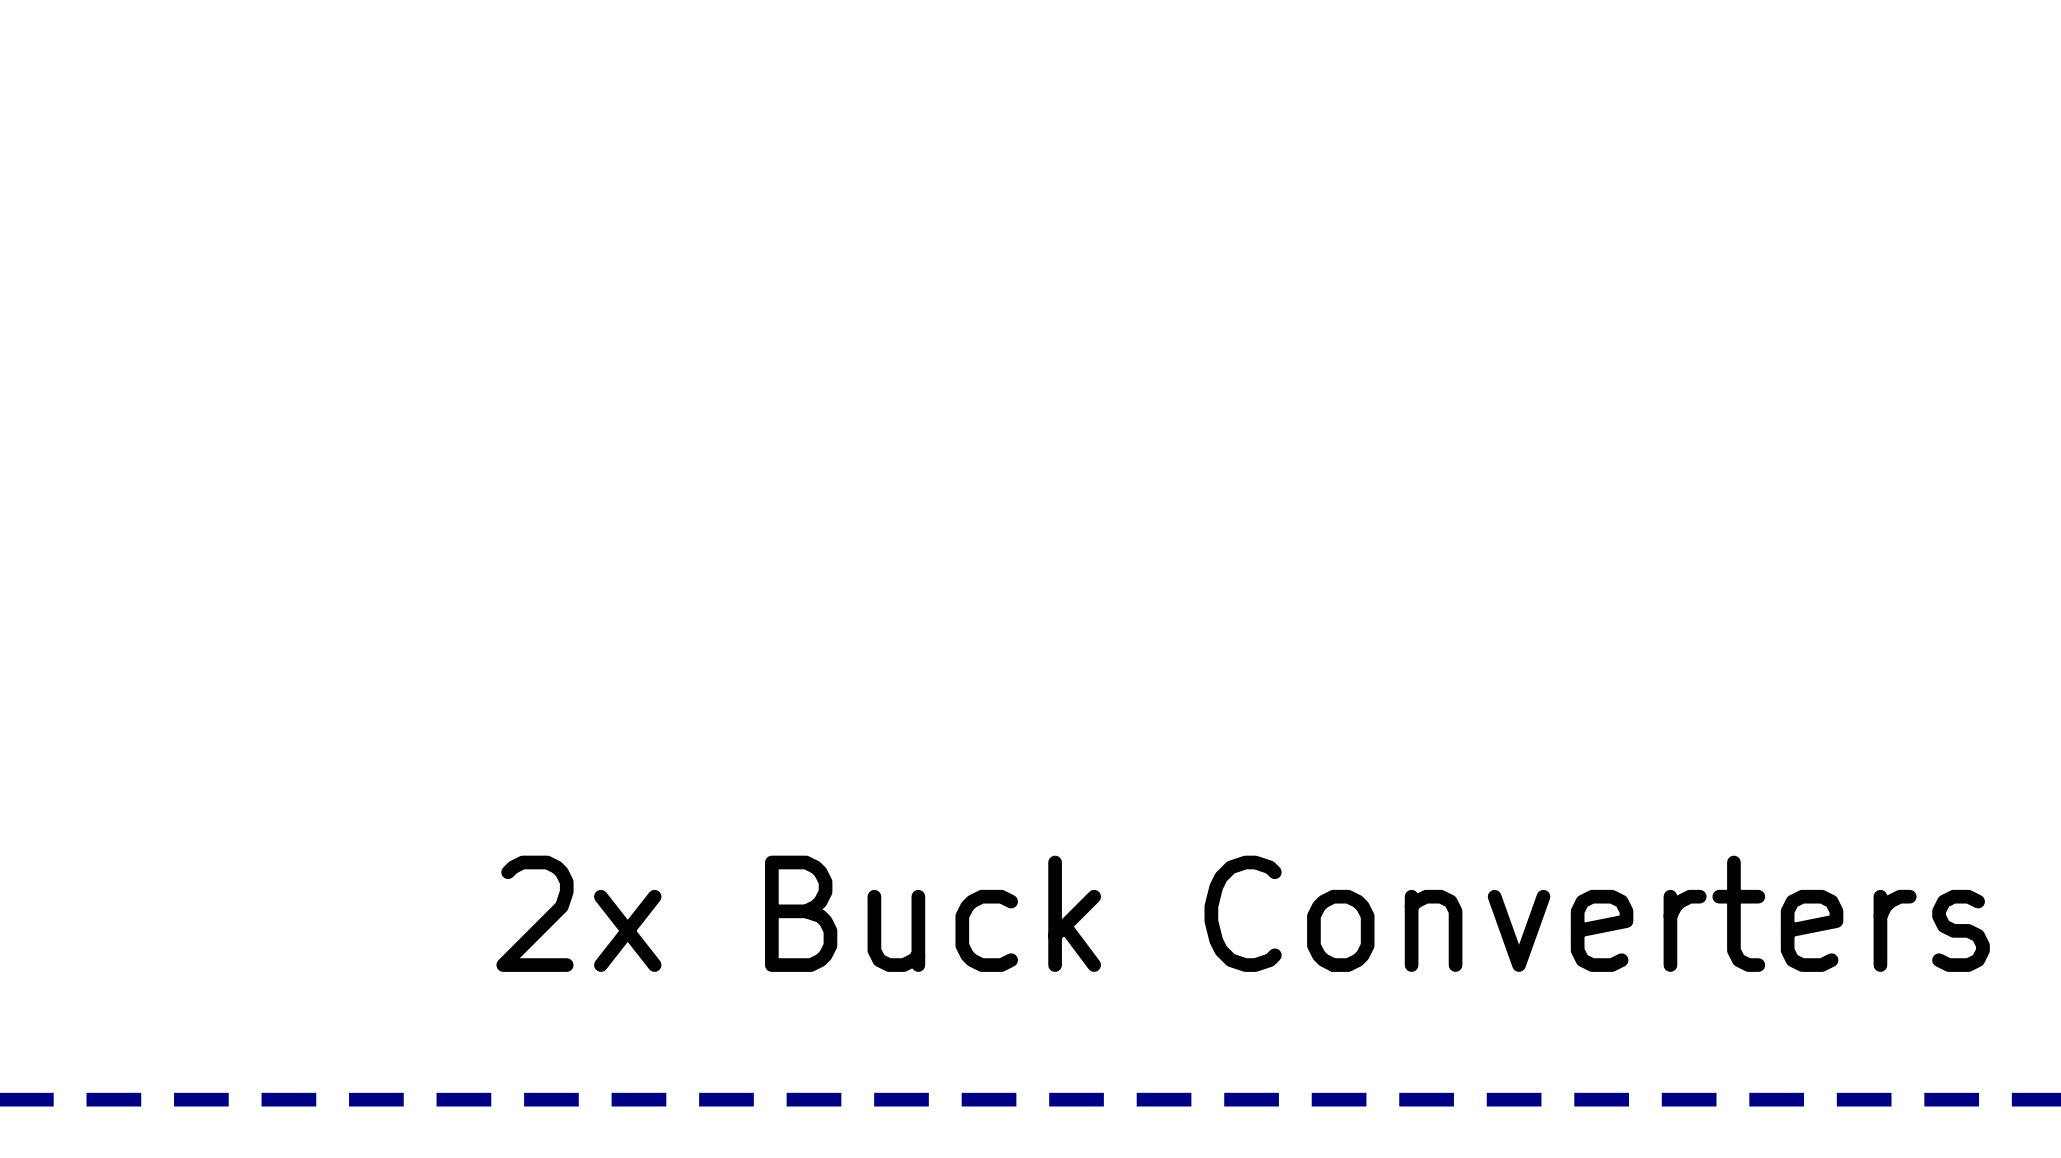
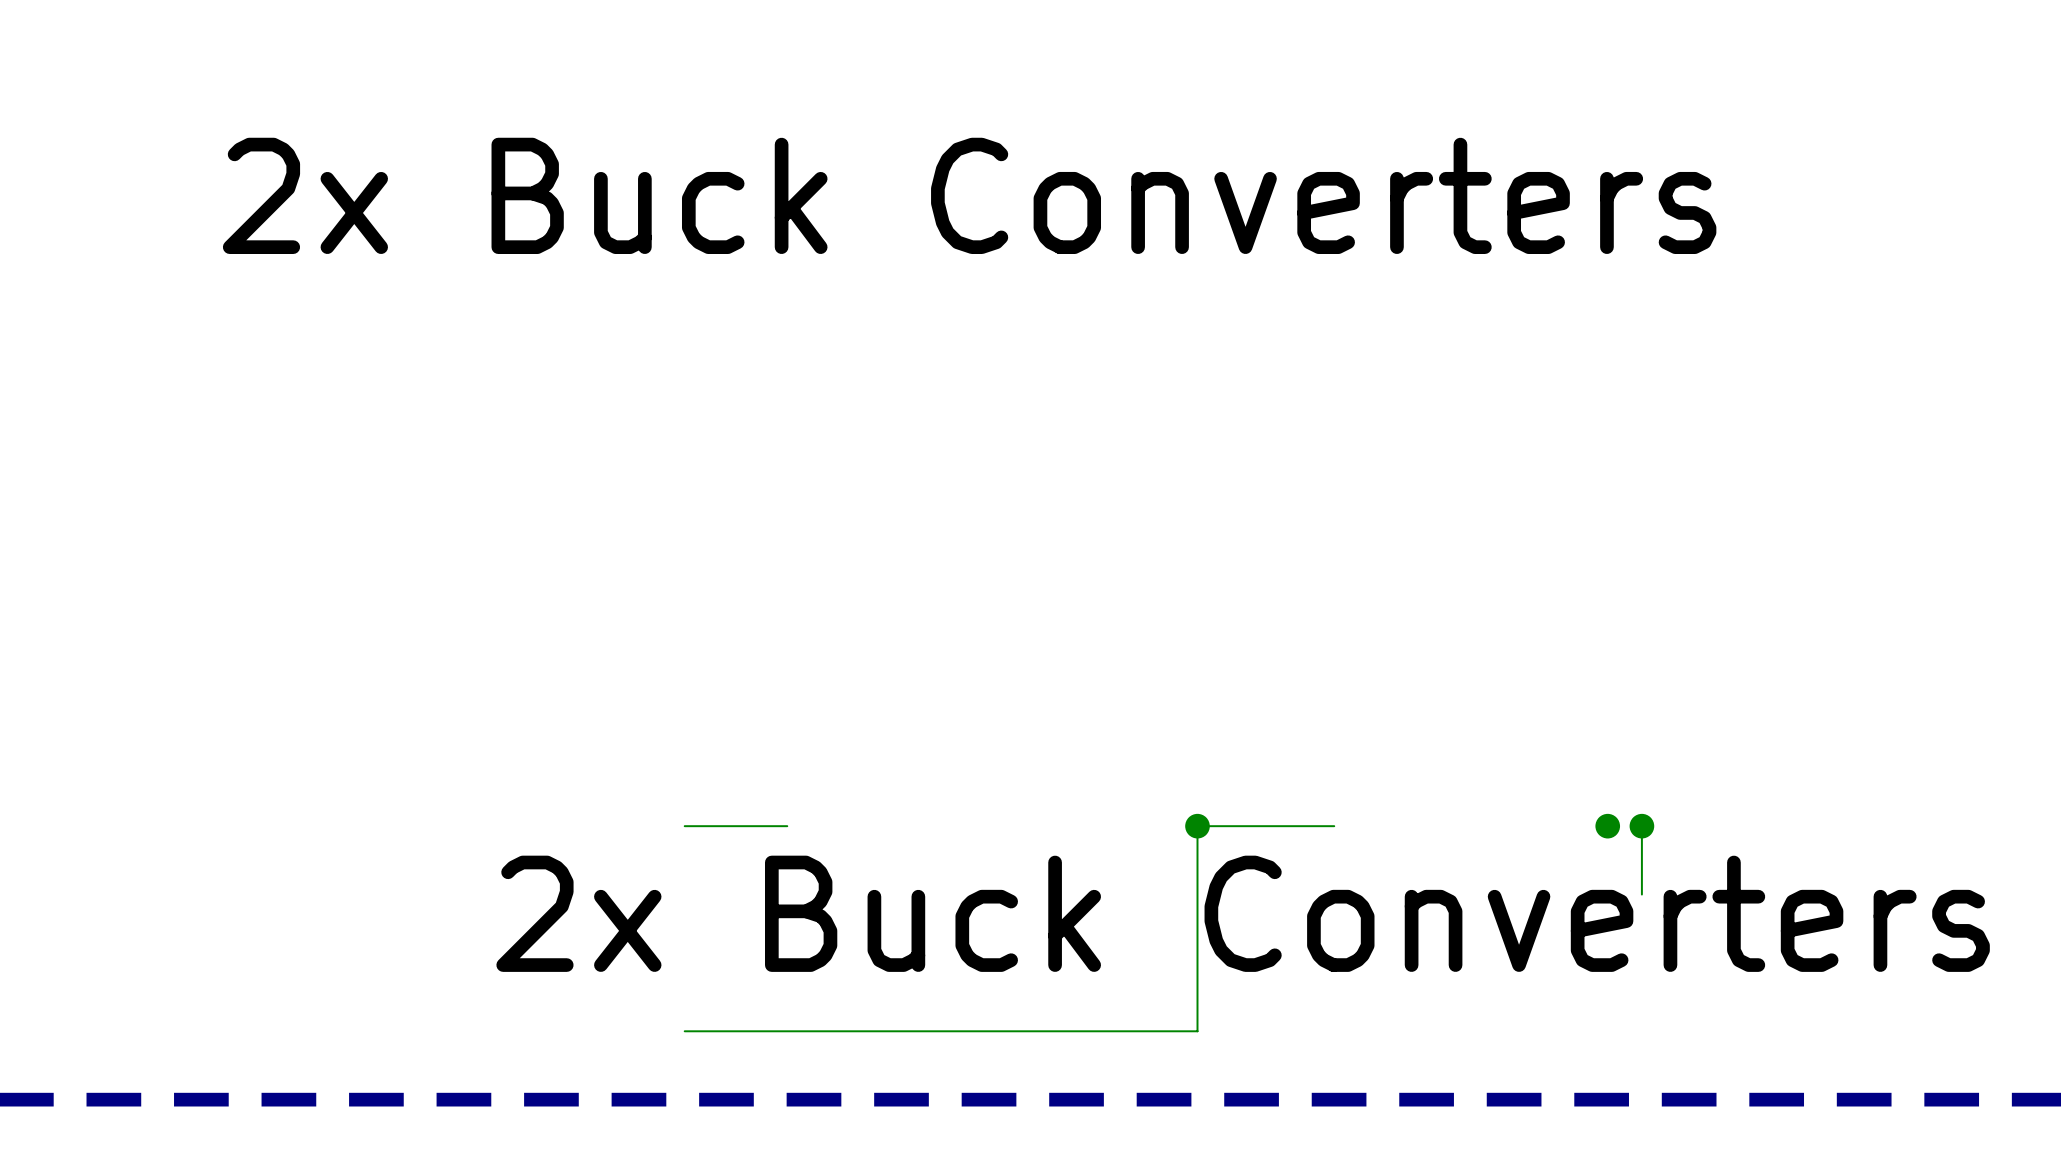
label: none -> 2x Buck Converters (969, 195)
wire: none -> (684, 826) (787, 826)
junction: none -> (1197, 826)
wire: none -> (1334, 826) (1197, 826) (1197, 1031) (684, 1031)
junction: none -> (1607, 826)
wire: none -> (1641, 826) (1641, 894)
junction: none -> (1641, 826)

